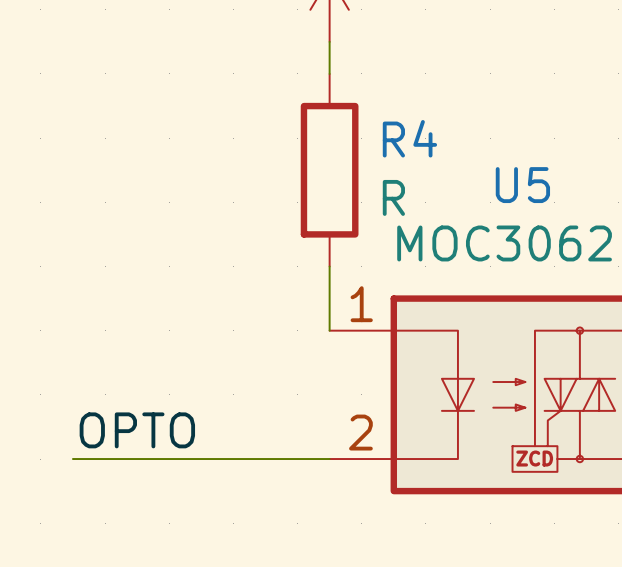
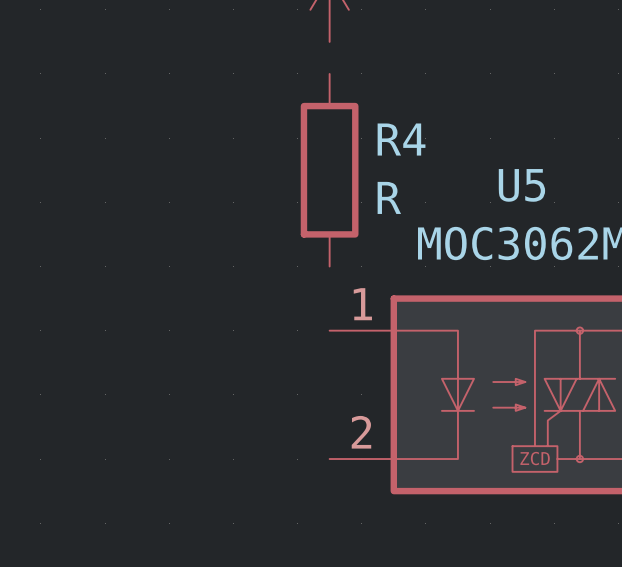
wire: (329, 41) (329, 73) -> none
wire: (329, 266) (329, 330) -> none
label: OPTO (137, 430) -> none
wire: (72, 459) (329, 459) -> none

